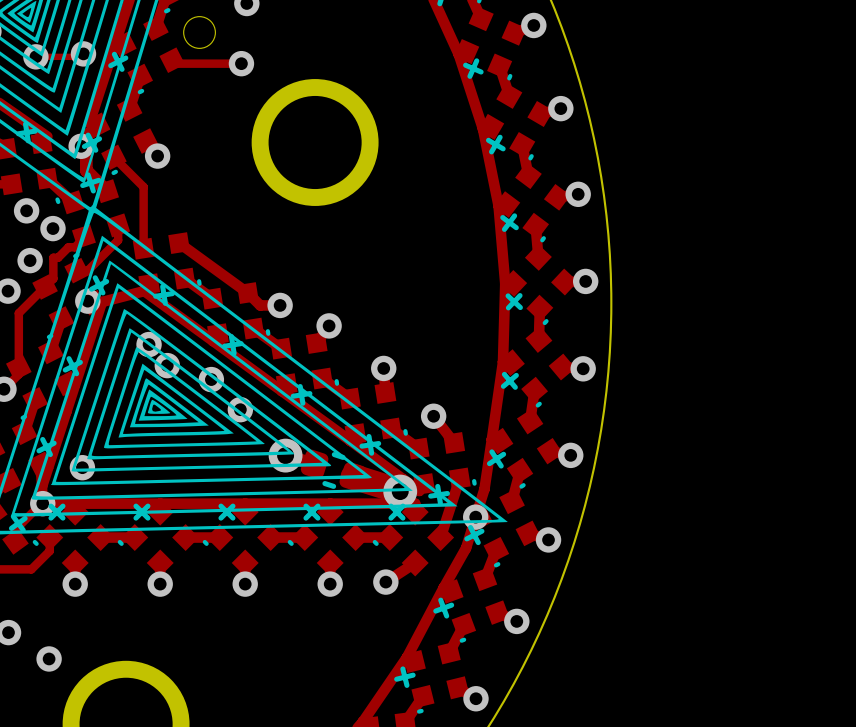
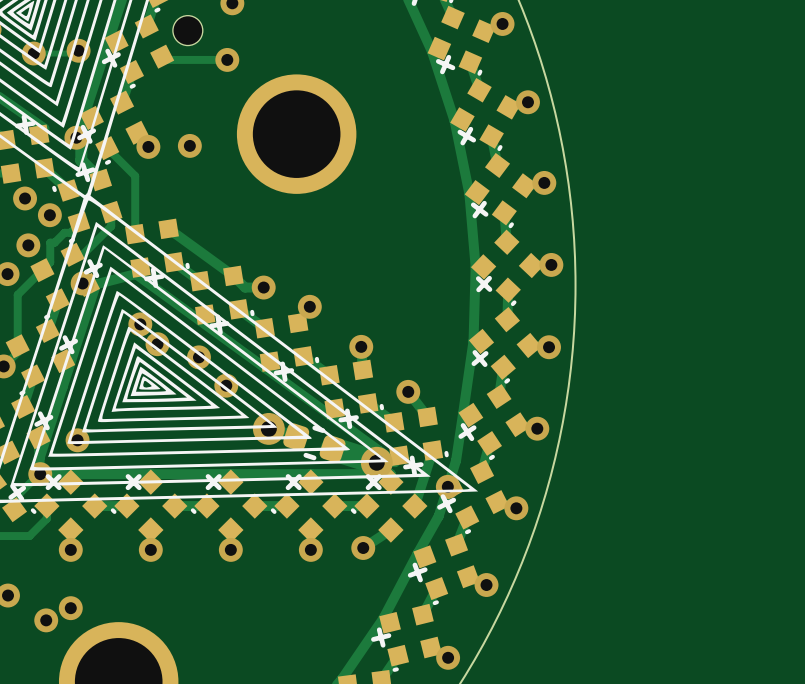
via: none -> (189, 145)
via: none -> (70, 608)

